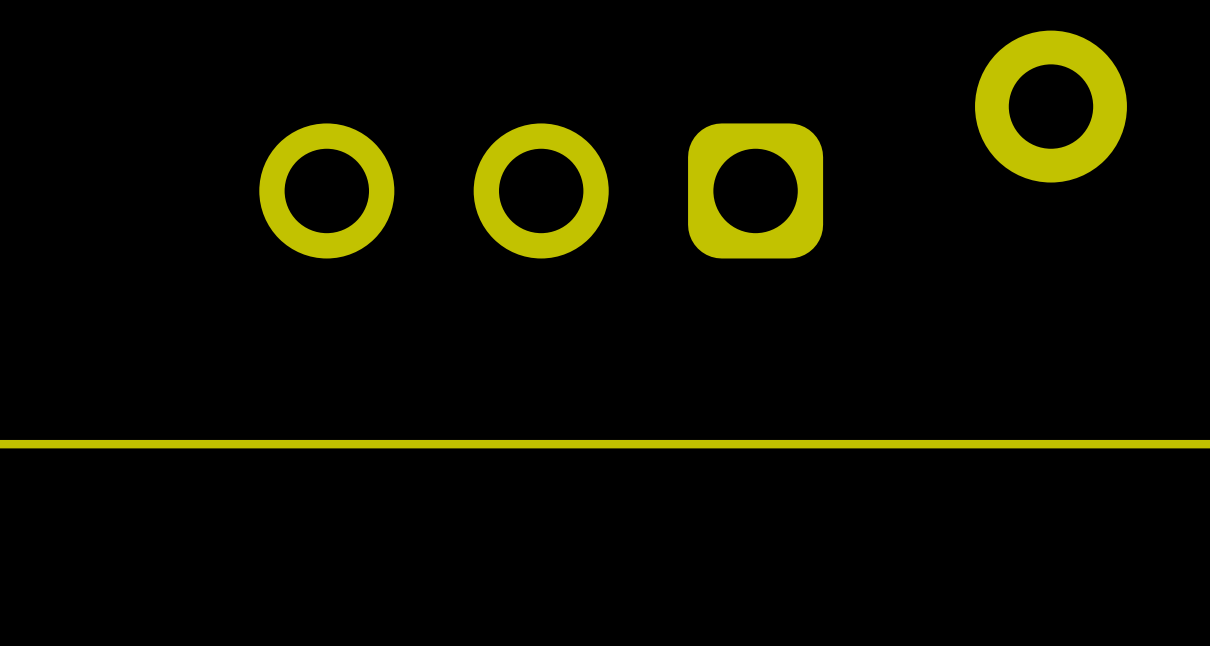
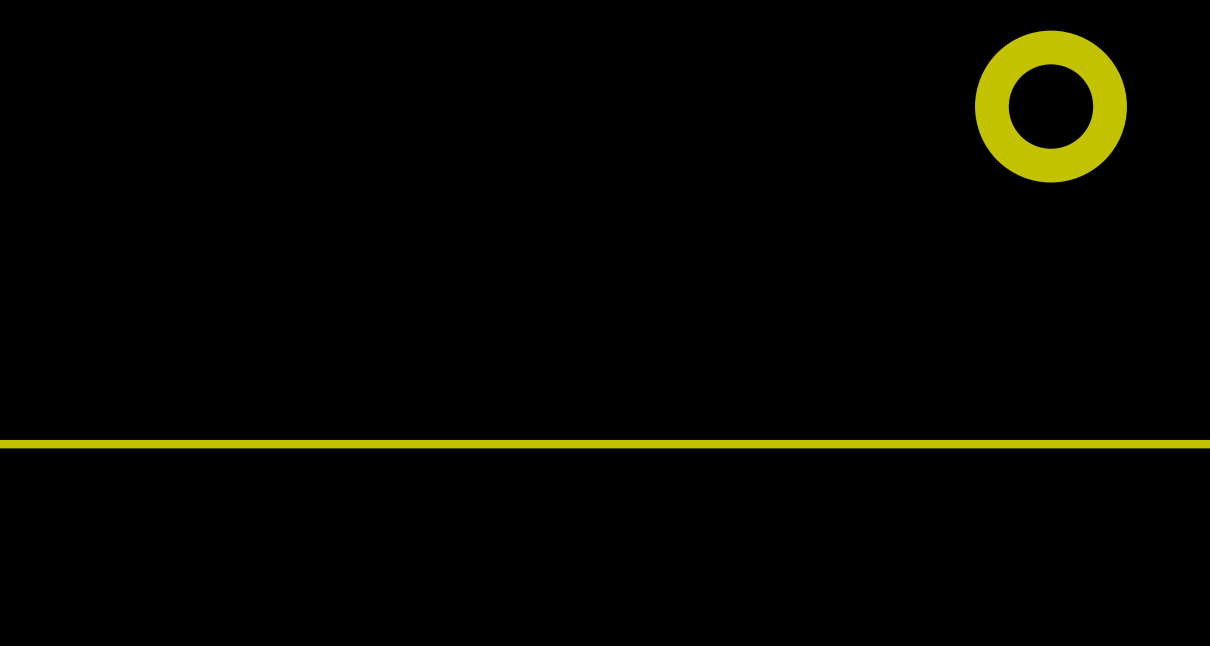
part: (541, 190) -> none

